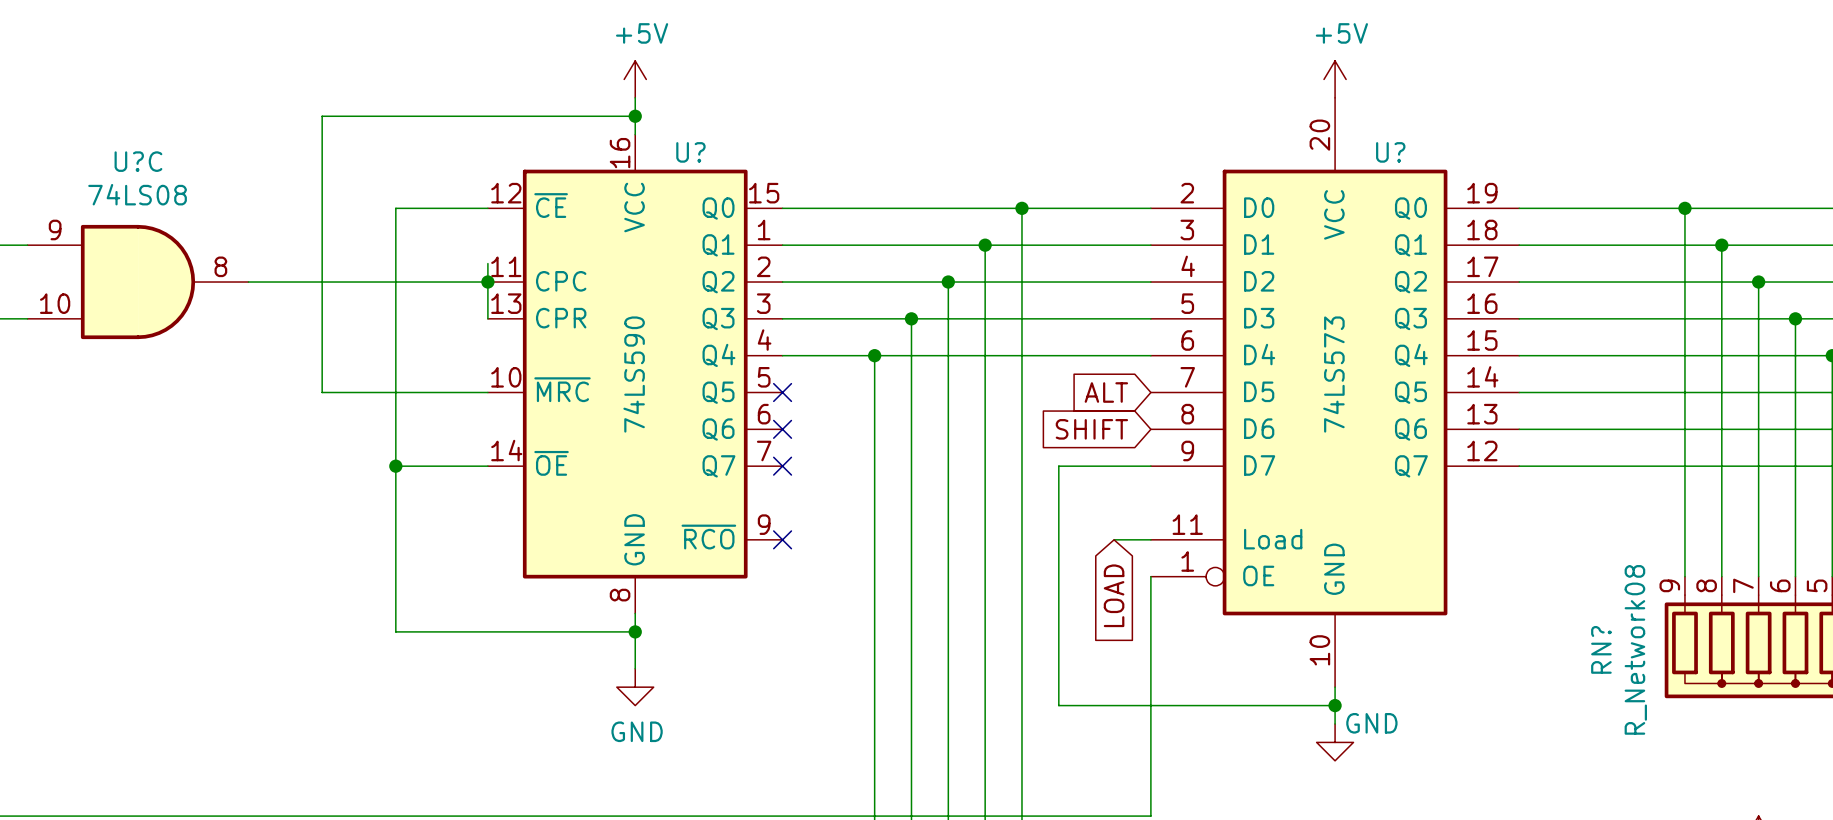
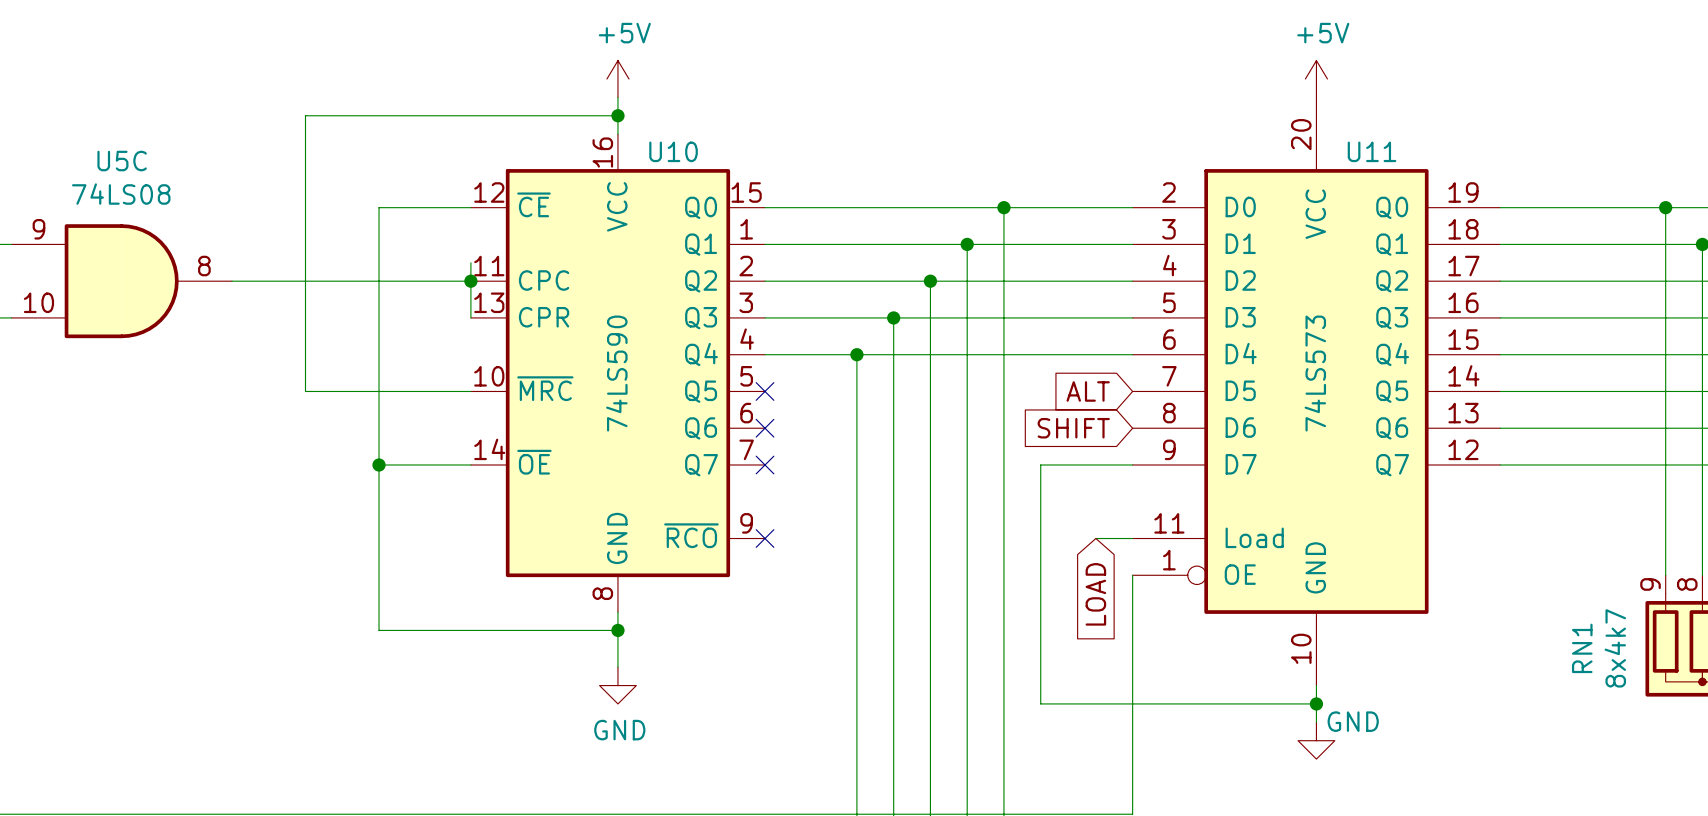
U? name: U? (690, 152) -> U10 (673, 151)
U? name: U? (1390, 152) -> U11 (1372, 151)
U?C name: U?C (138, 161) -> U5C (122, 161)
RN? name: RN? (1601, 649) -> RN1 (1582, 648)
RN? value: R_Network08 (1635, 649) -> 8x4k7 (1615, 648)

